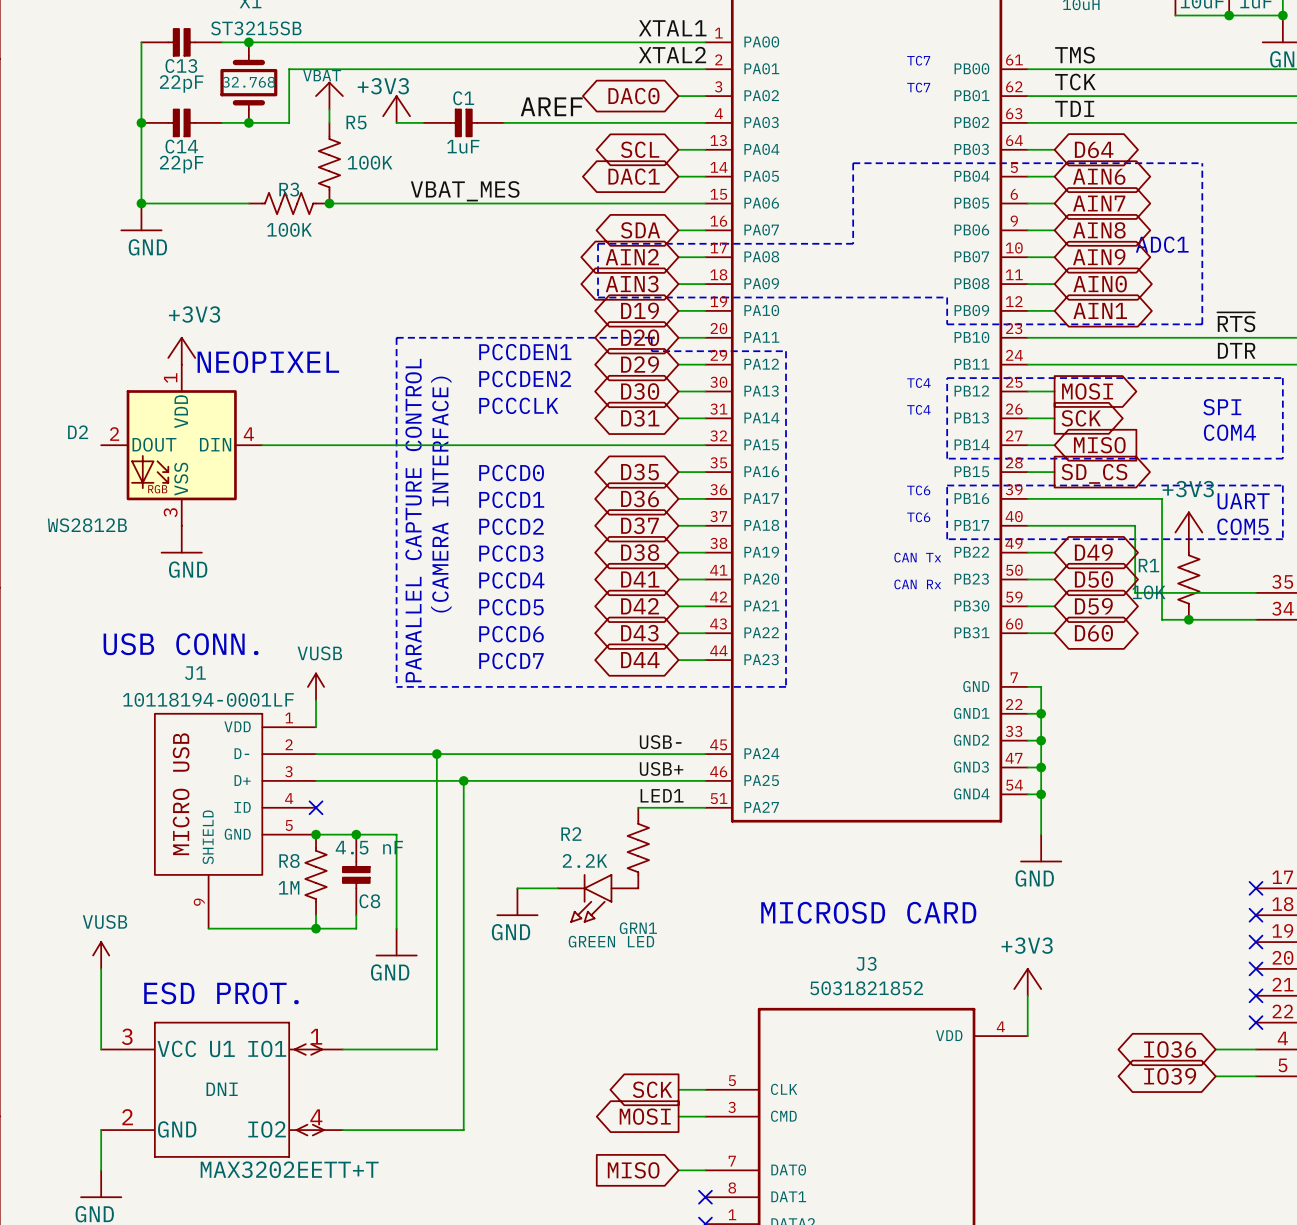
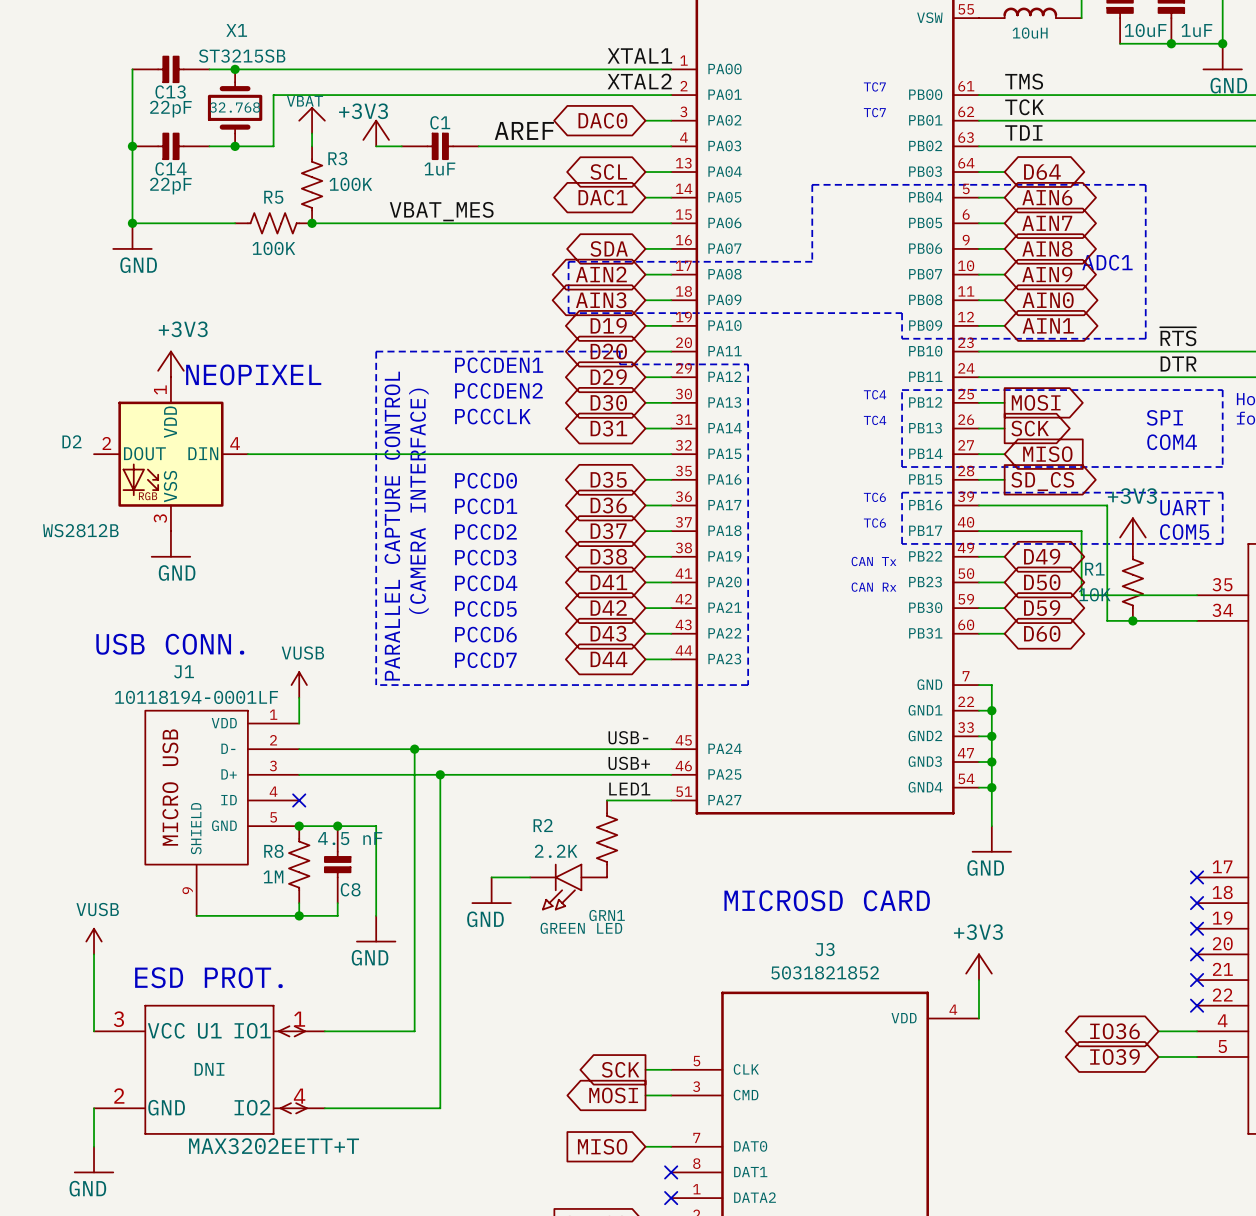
R5 name position: R5 (356, 122) -> R5 (273, 197)
R3 name position: R3 (289, 189) -> R3 (337, 158)

